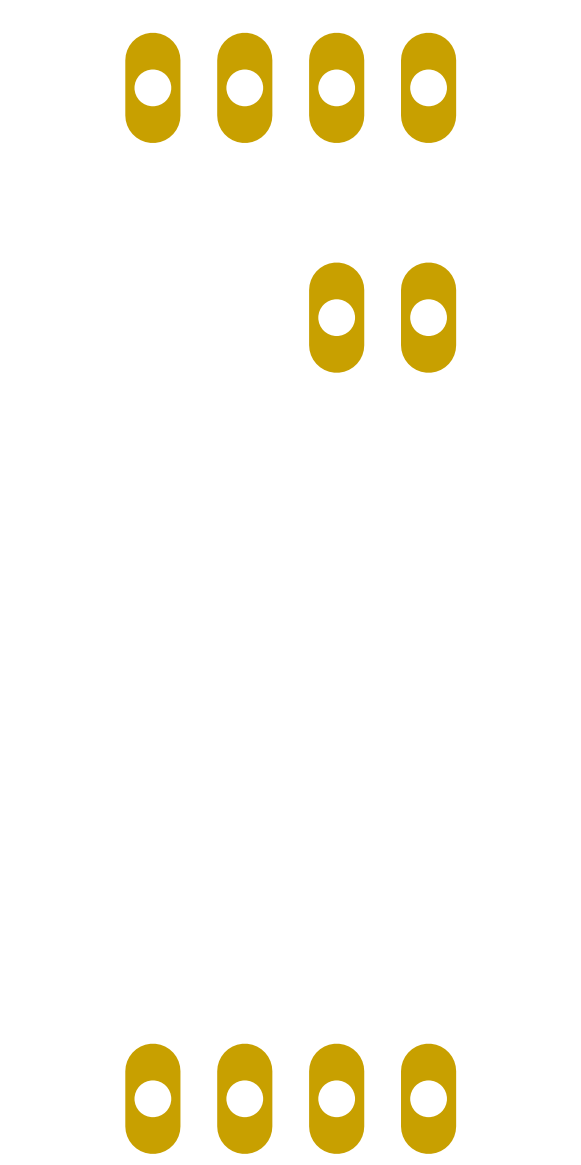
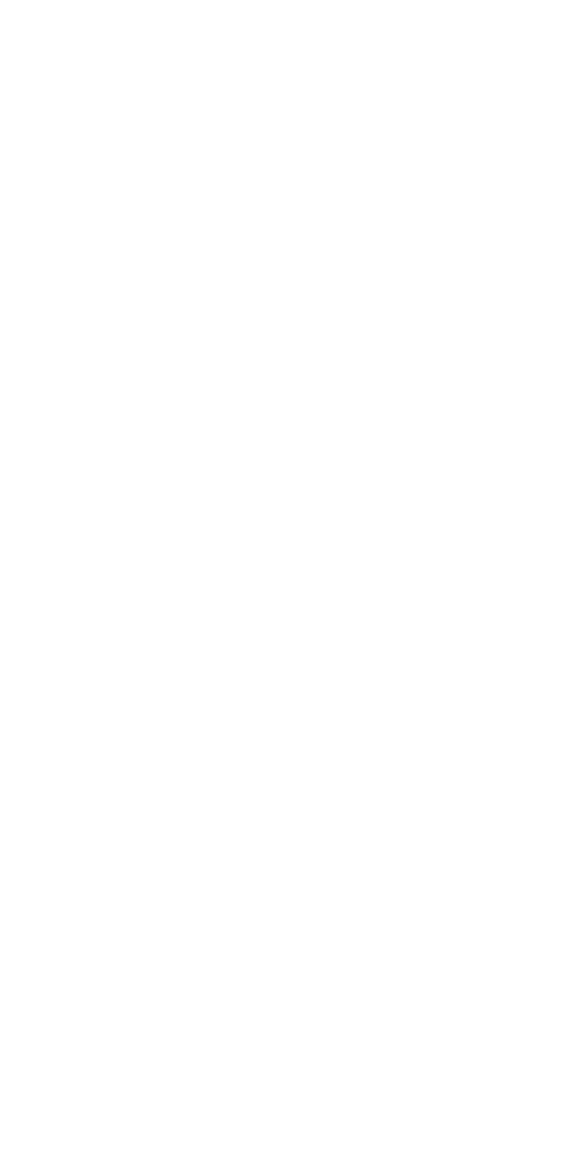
part: (290, 87) -> none
part: (382, 317) -> none
part: (290, 1098) -> none

